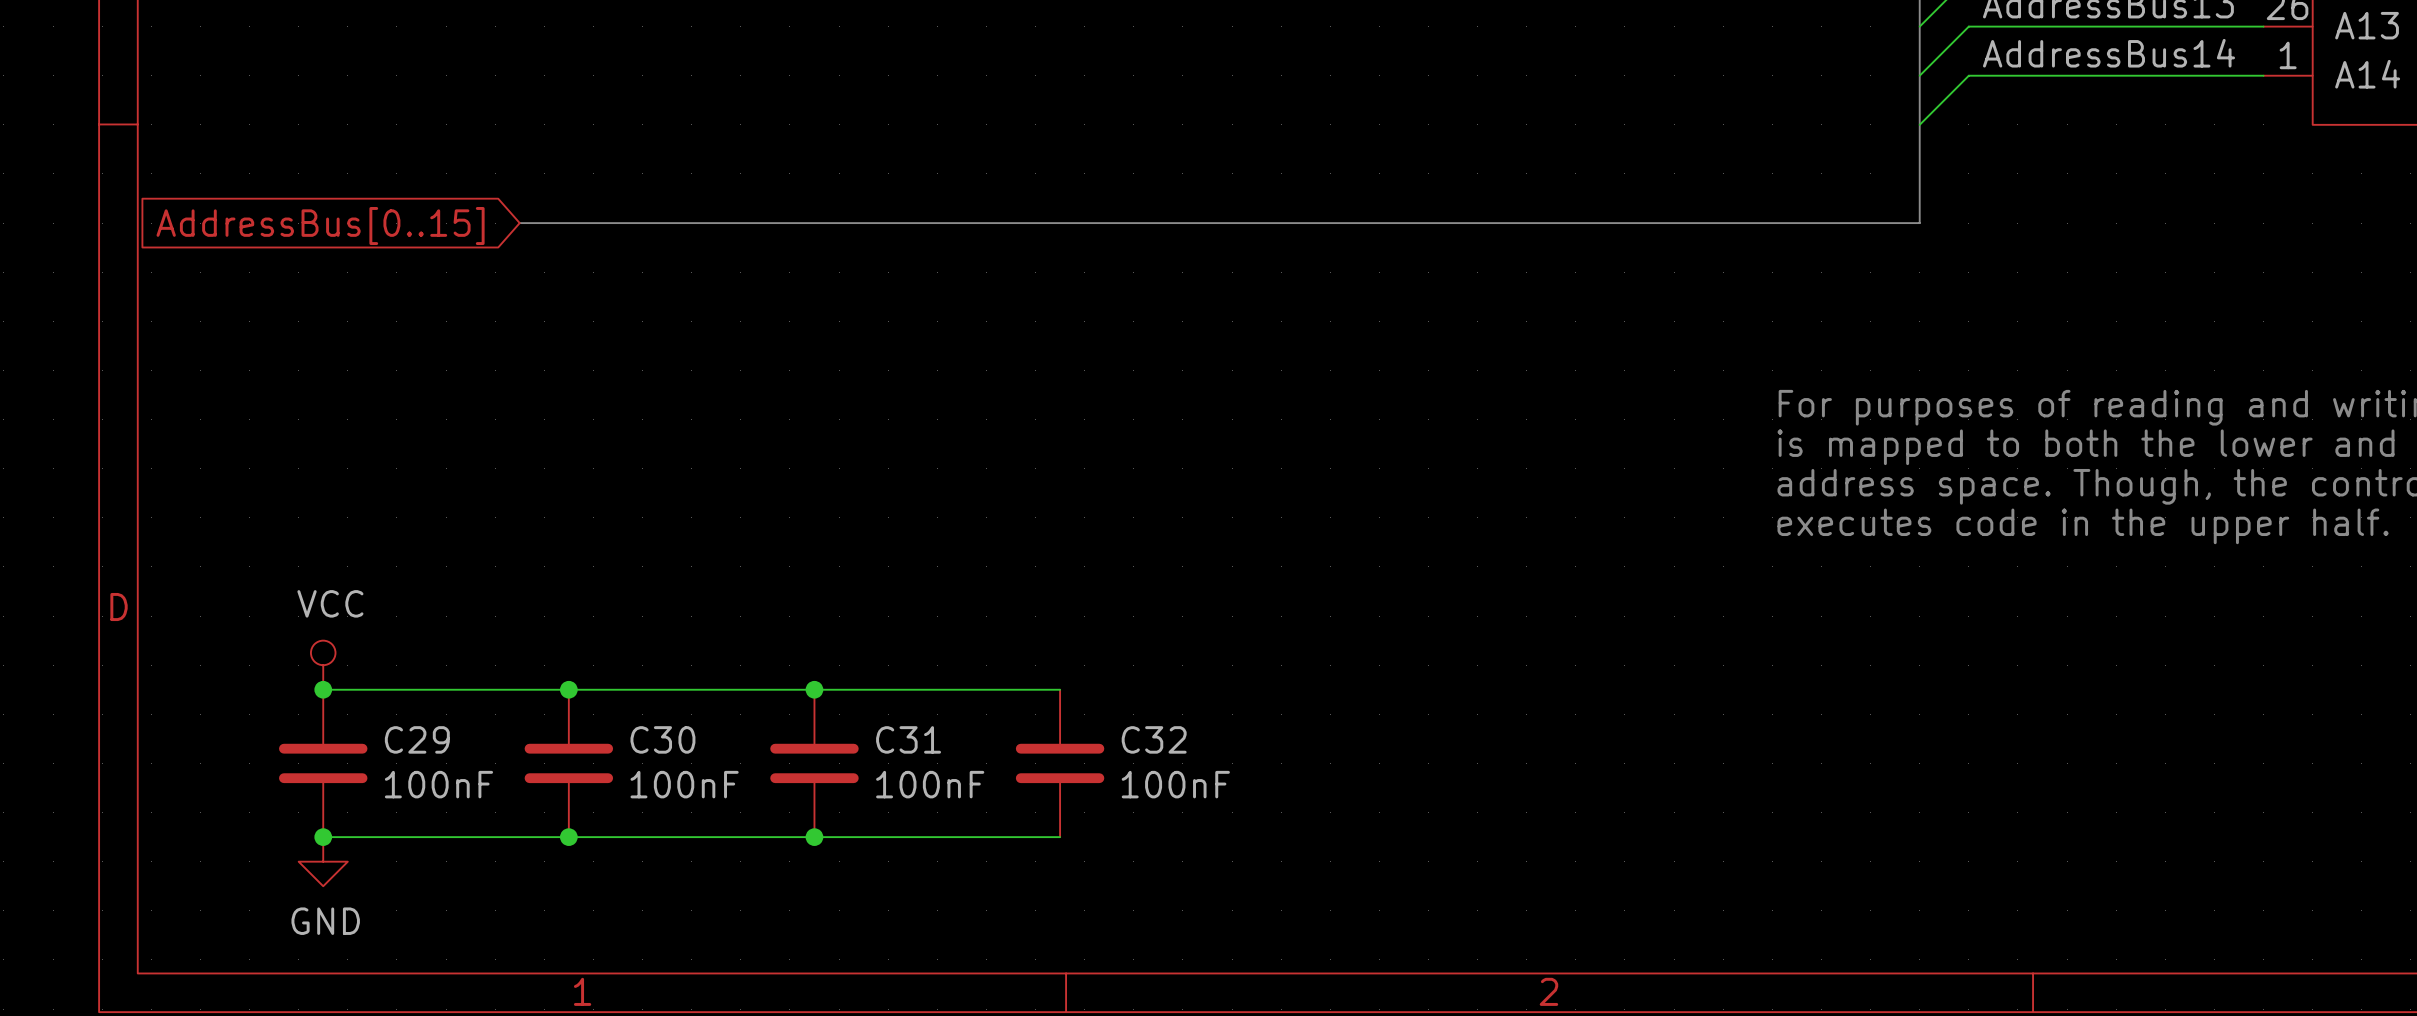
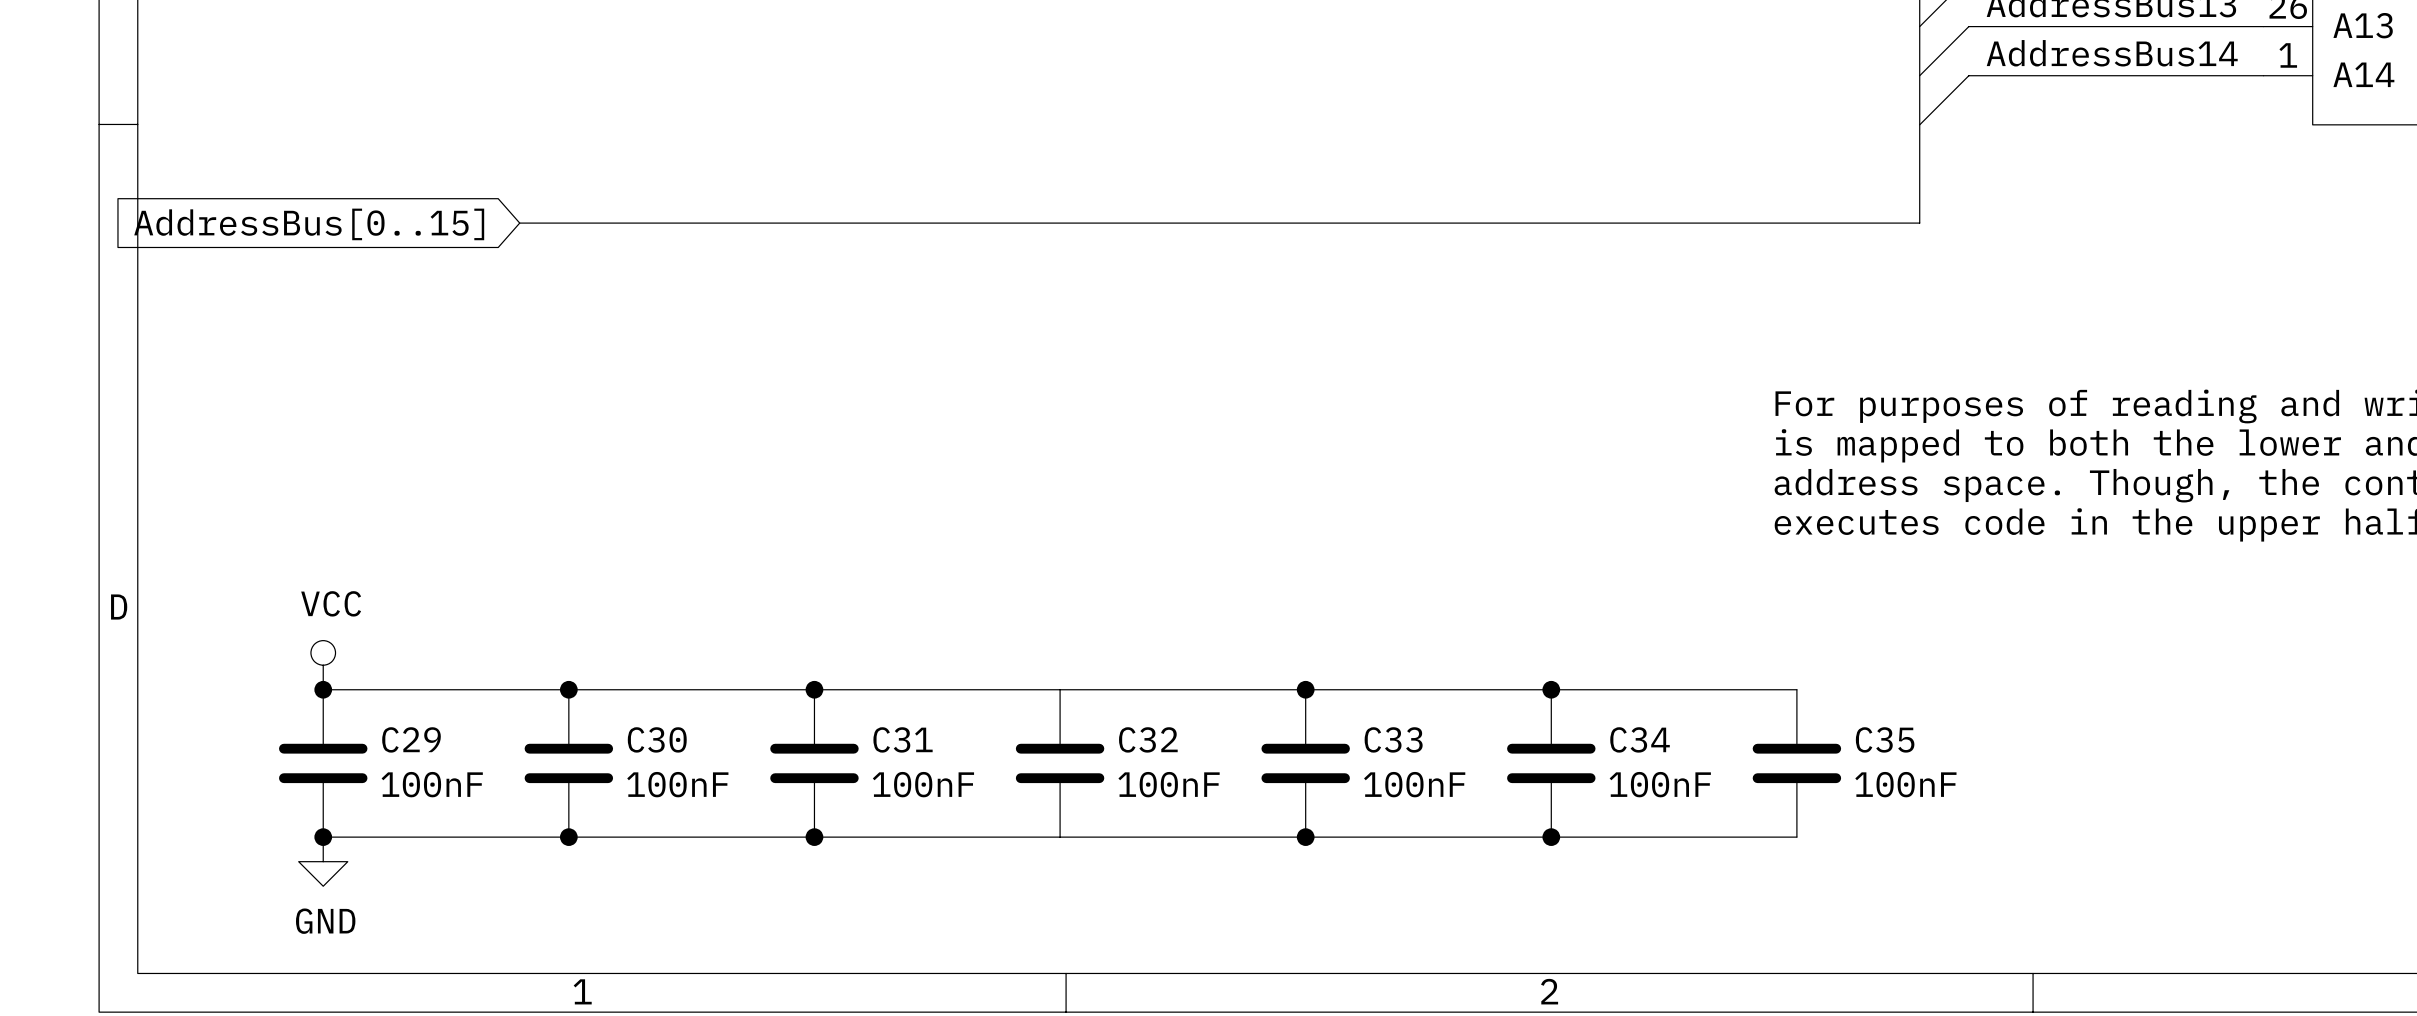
wire: none -> (1060, 689) (1796, 689)
junction: none -> (1305, 689)
junction: none -> (1551, 689)
C33: none -> 100nF (1305, 763)
C34: none -> 100nF (1551, 763)
C35: none -> 100nF (1796, 763)
wire: none -> (1060, 837) (1796, 837)
junction: none -> (1305, 837)
junction: none -> (1551, 837)

